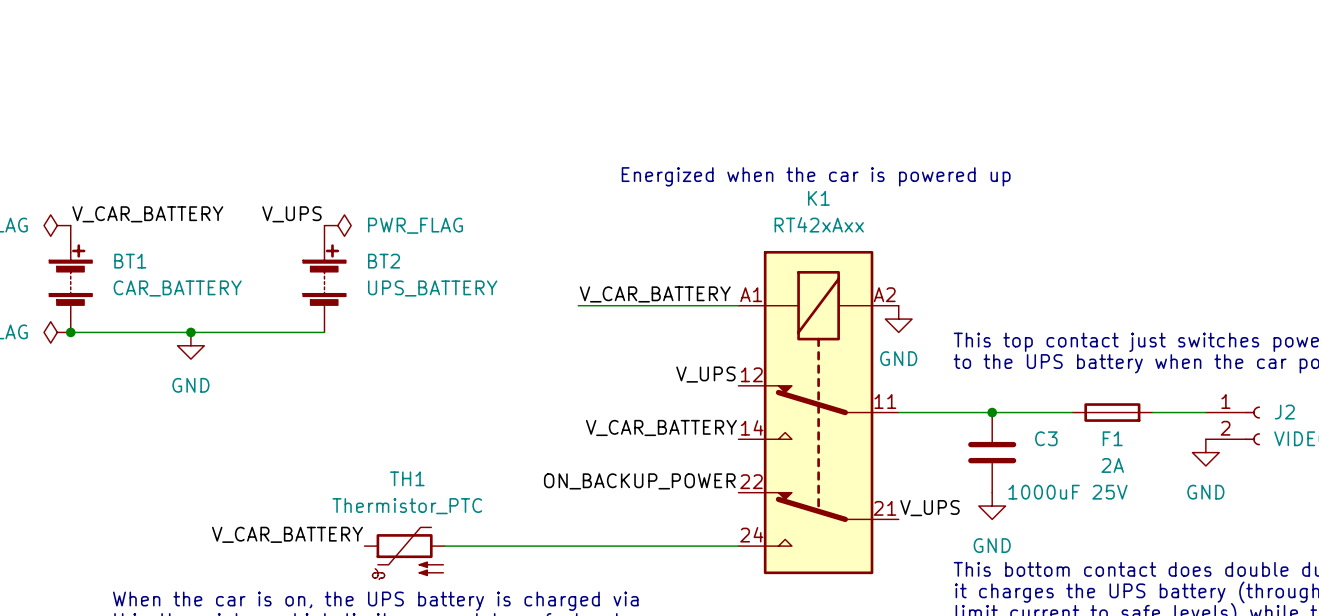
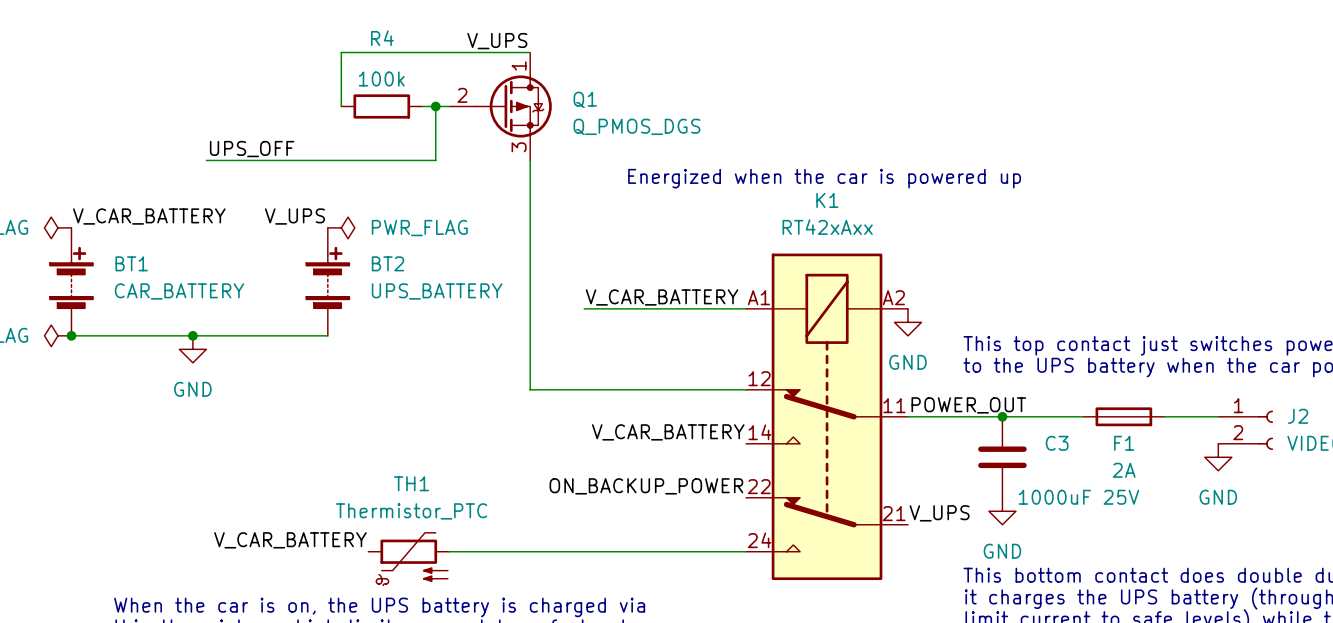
label: none -> V_UPS (497, 41)
wire: none -> (530, 52) (341, 52) (341, 106)
R4: none -> 100k (381, 106)
wire: none -> (422, 106) (449, 106)
wire: none -> (435, 106) (435, 160) (206, 160)
junction: none -> (435, 106)
Q1: none -> Q_PMOS_DGS (500, 106)
label: none -> UPS_OFF (252, 149)
wire: none -> (530, 160) (530, 389) (746, 389)
label: V_UPS (705, 374) -> none
label: none -> POWER_OUT (968, 405)

